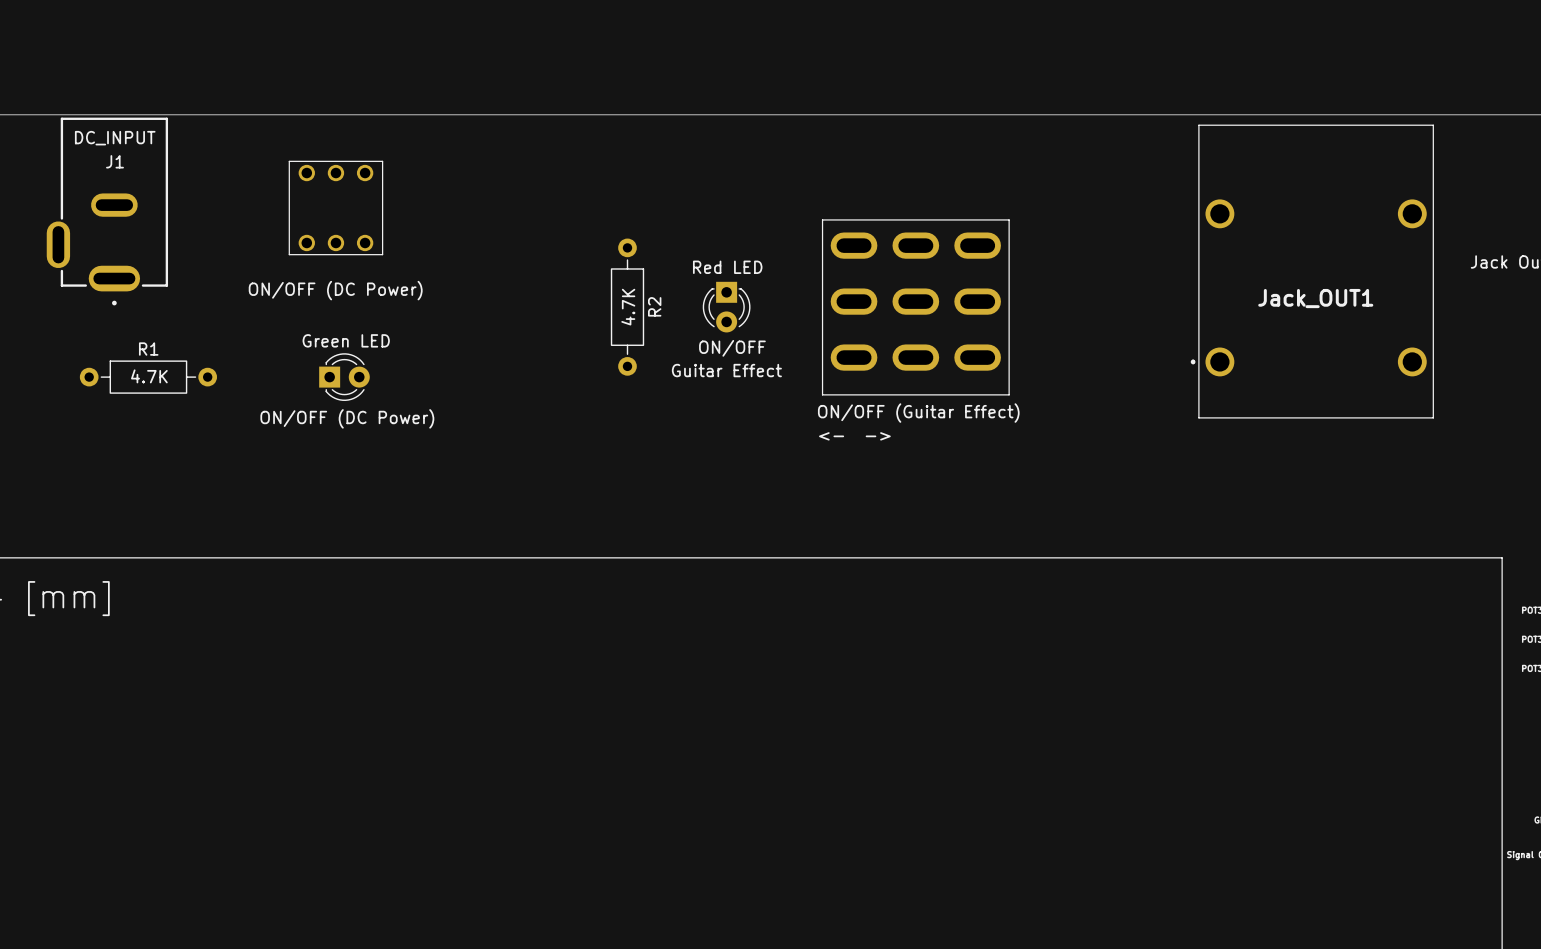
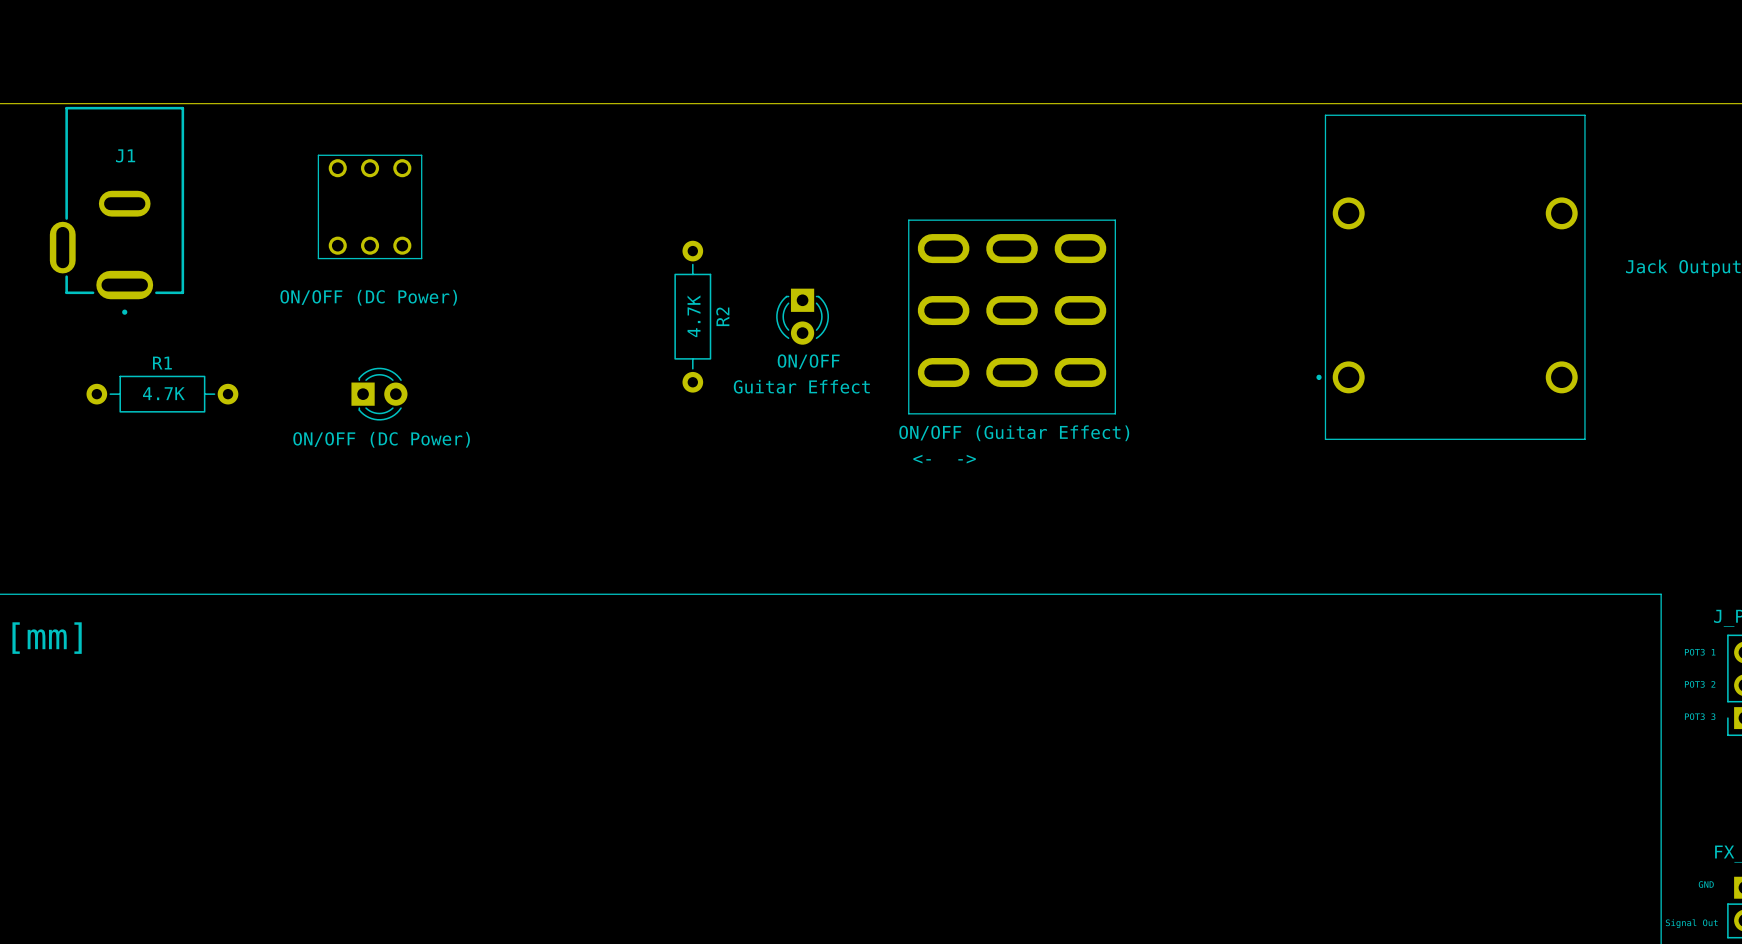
J1 value: DC_INPUT (115, 138) -> none
text: Red LED (727, 267) -> none
Jack_OUT1 name: Jack_OUT1 (1315, 298) -> none
text: Green LED (346, 340) -> none

